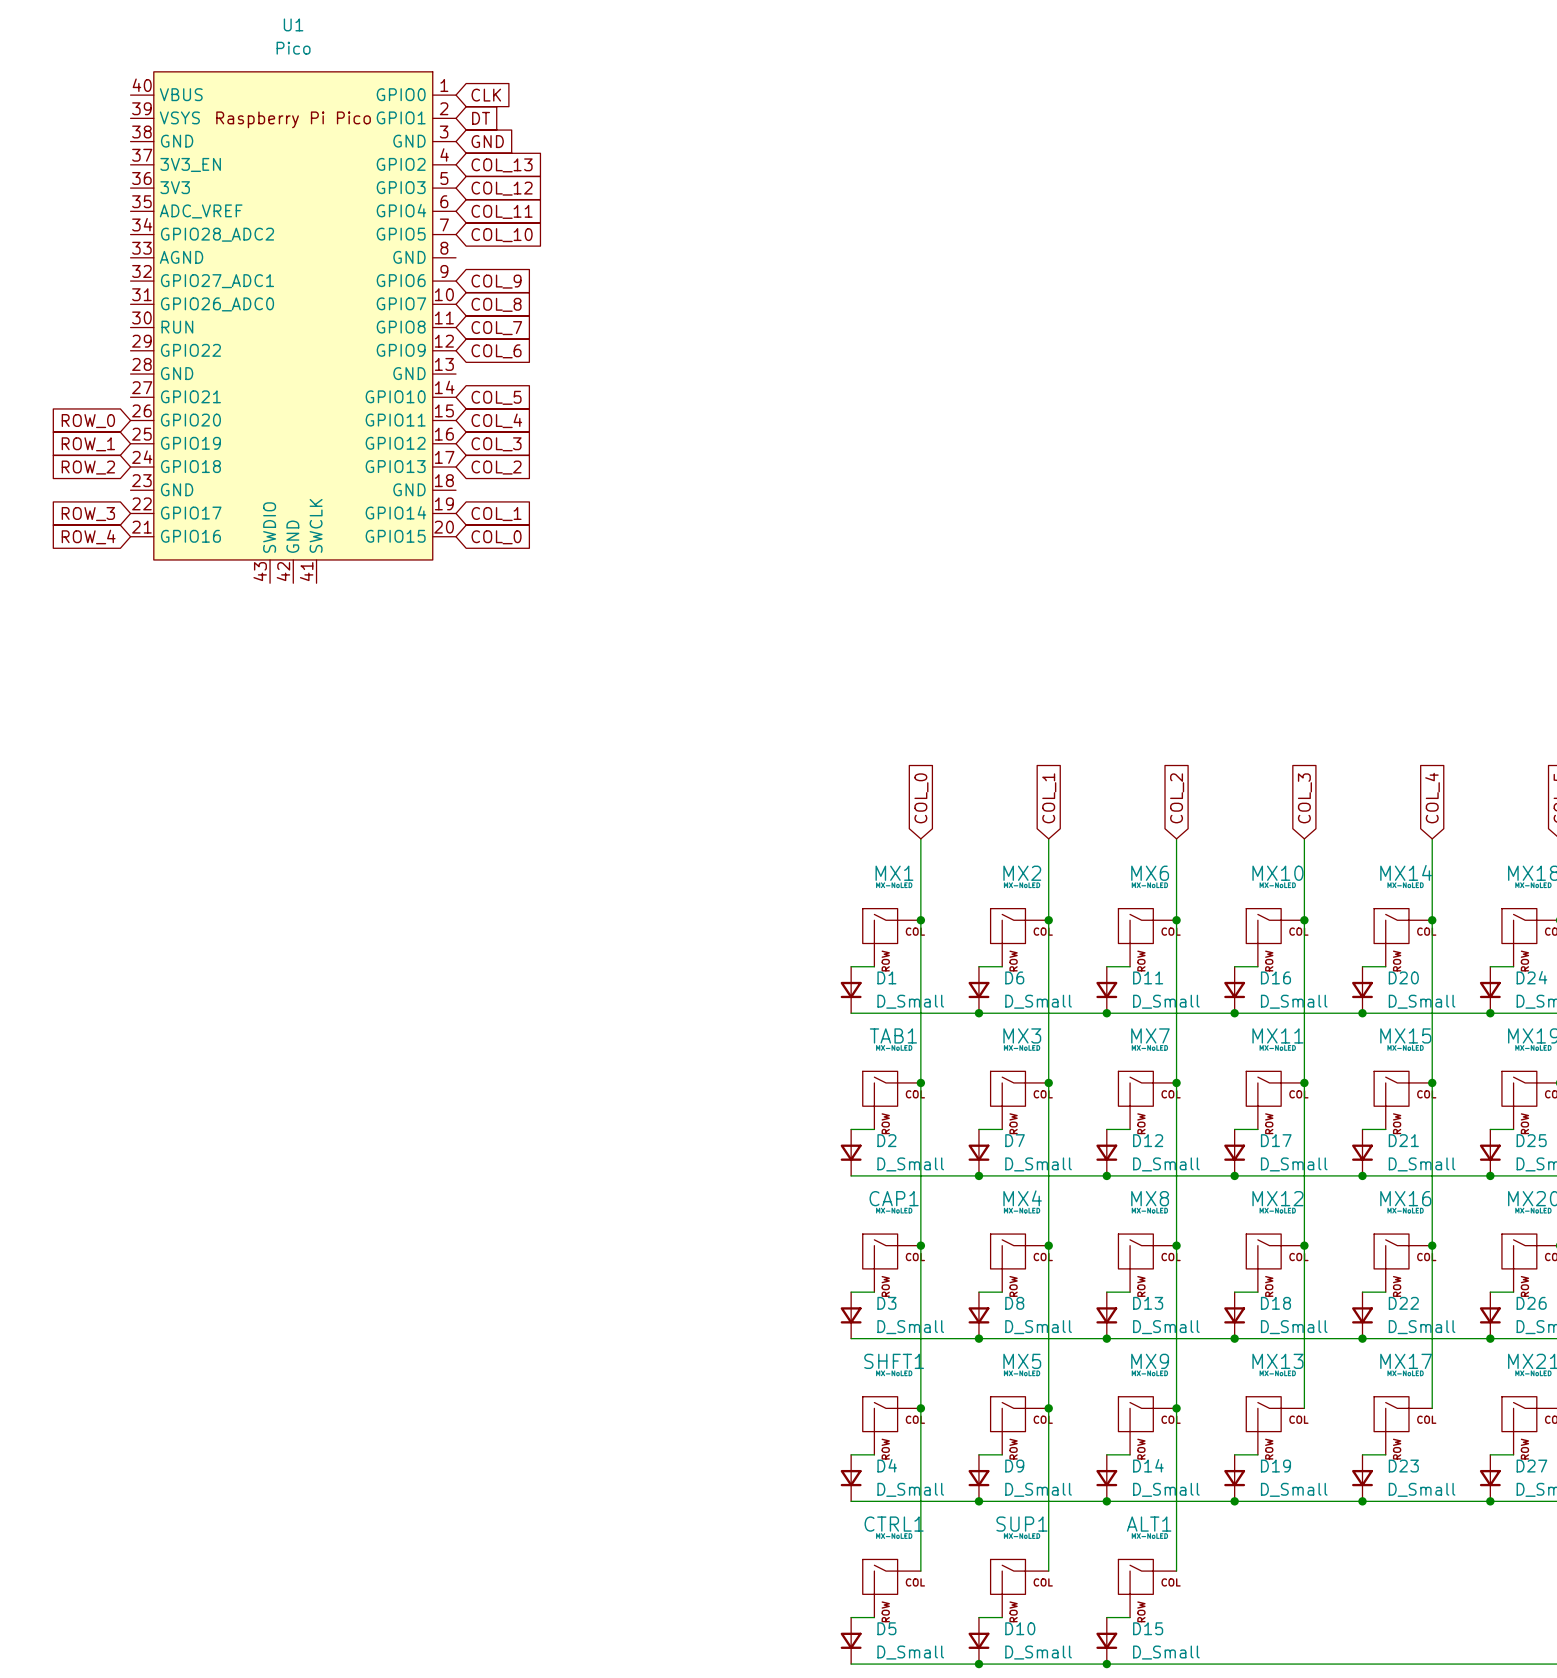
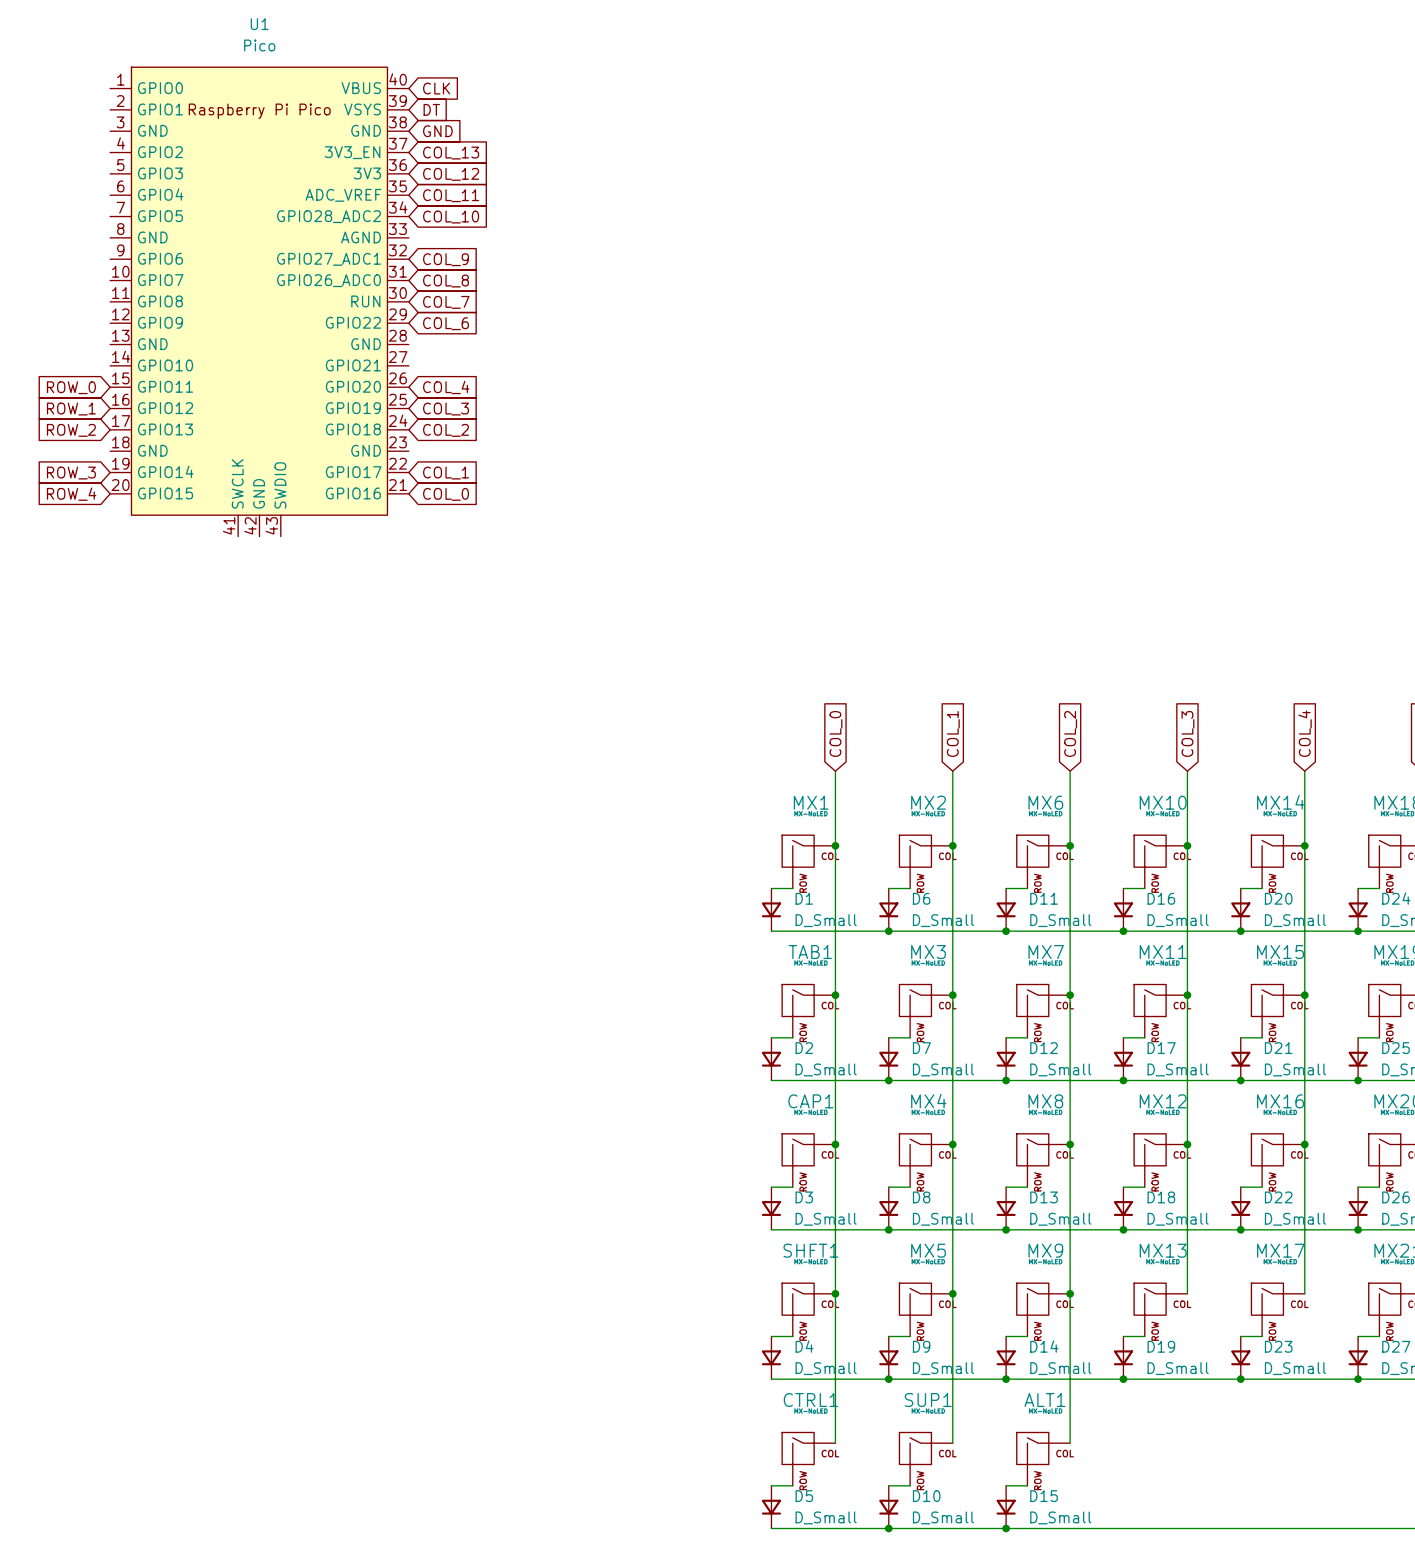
U1 flip: as is (293, 315) -> left-right (259, 291)
global label: COL_5 (496, 397) -> none

